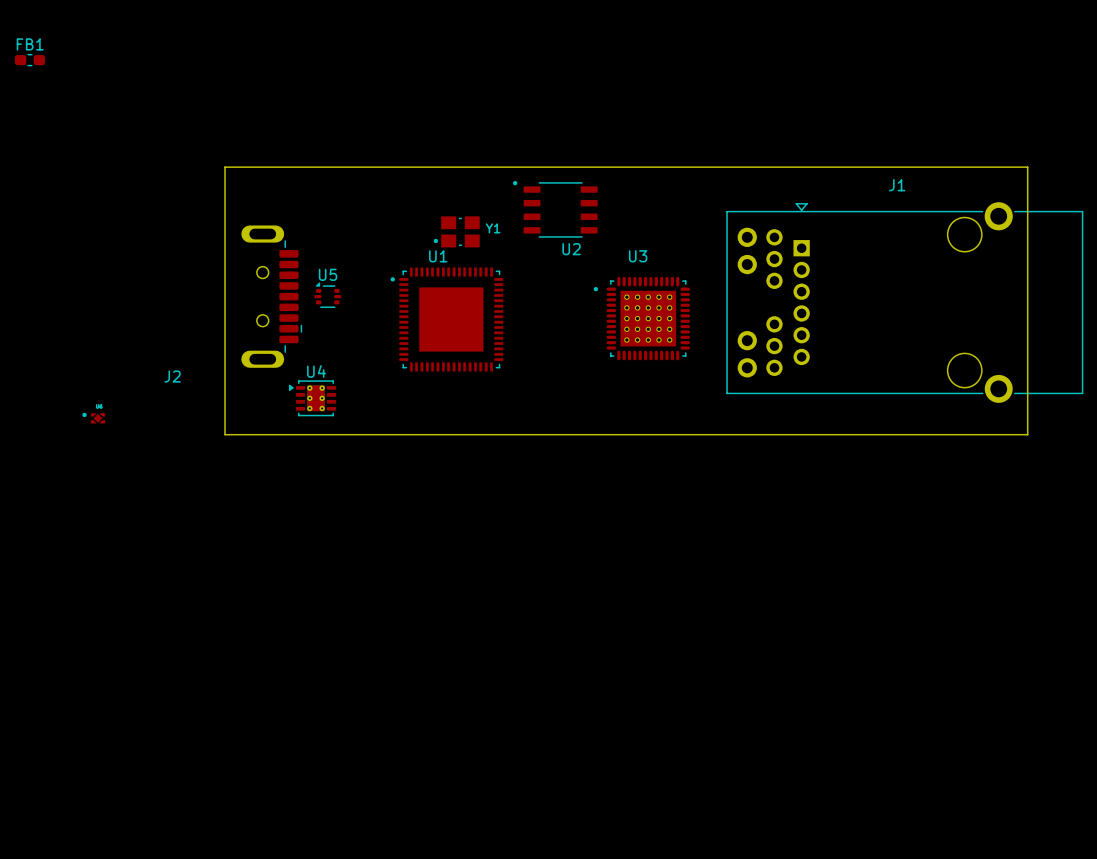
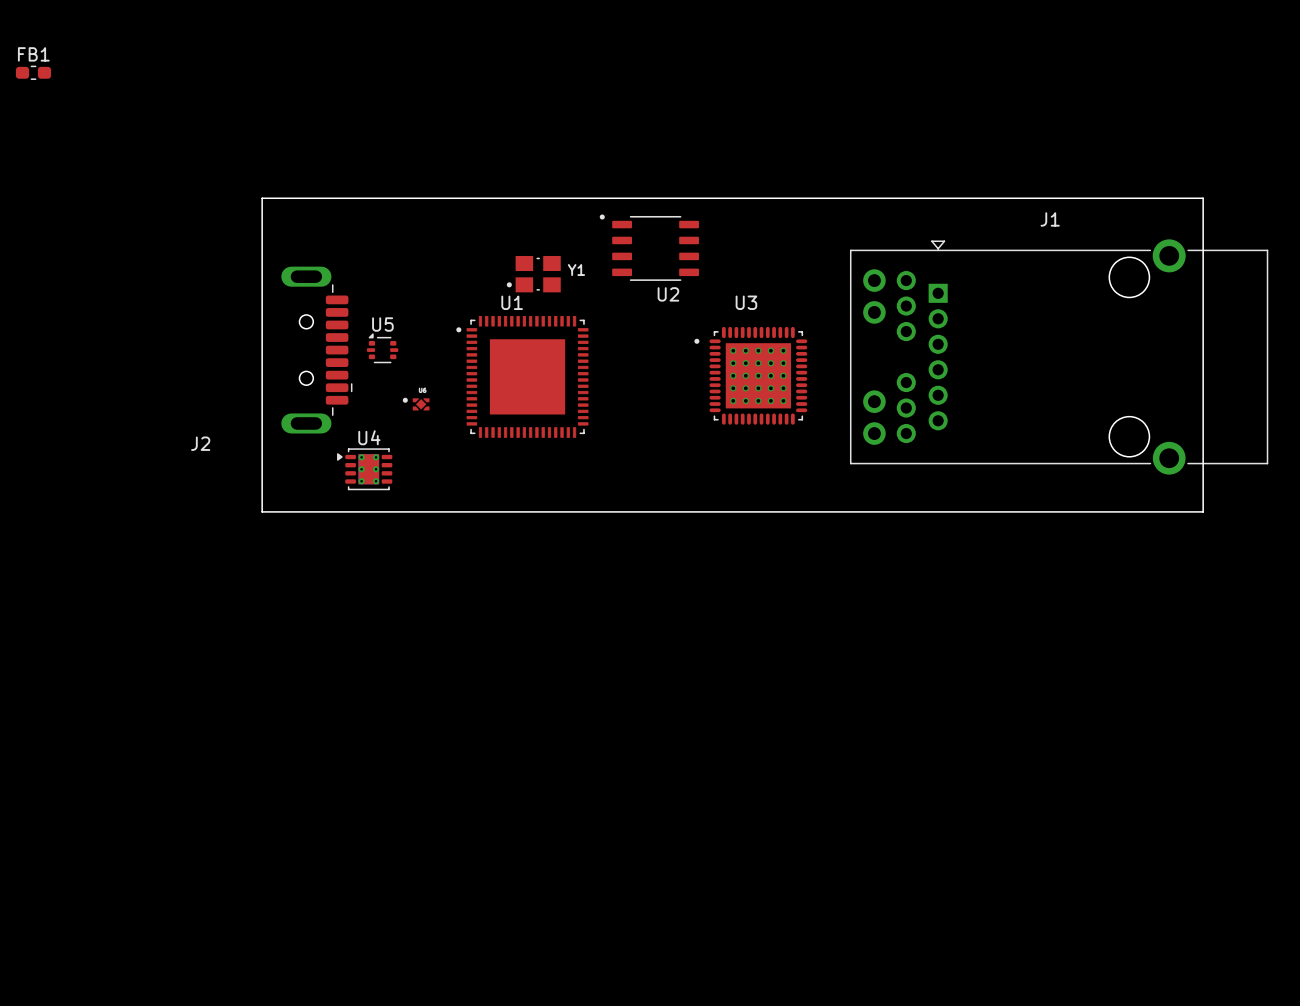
part position: (93, 418) -> (416, 404)

